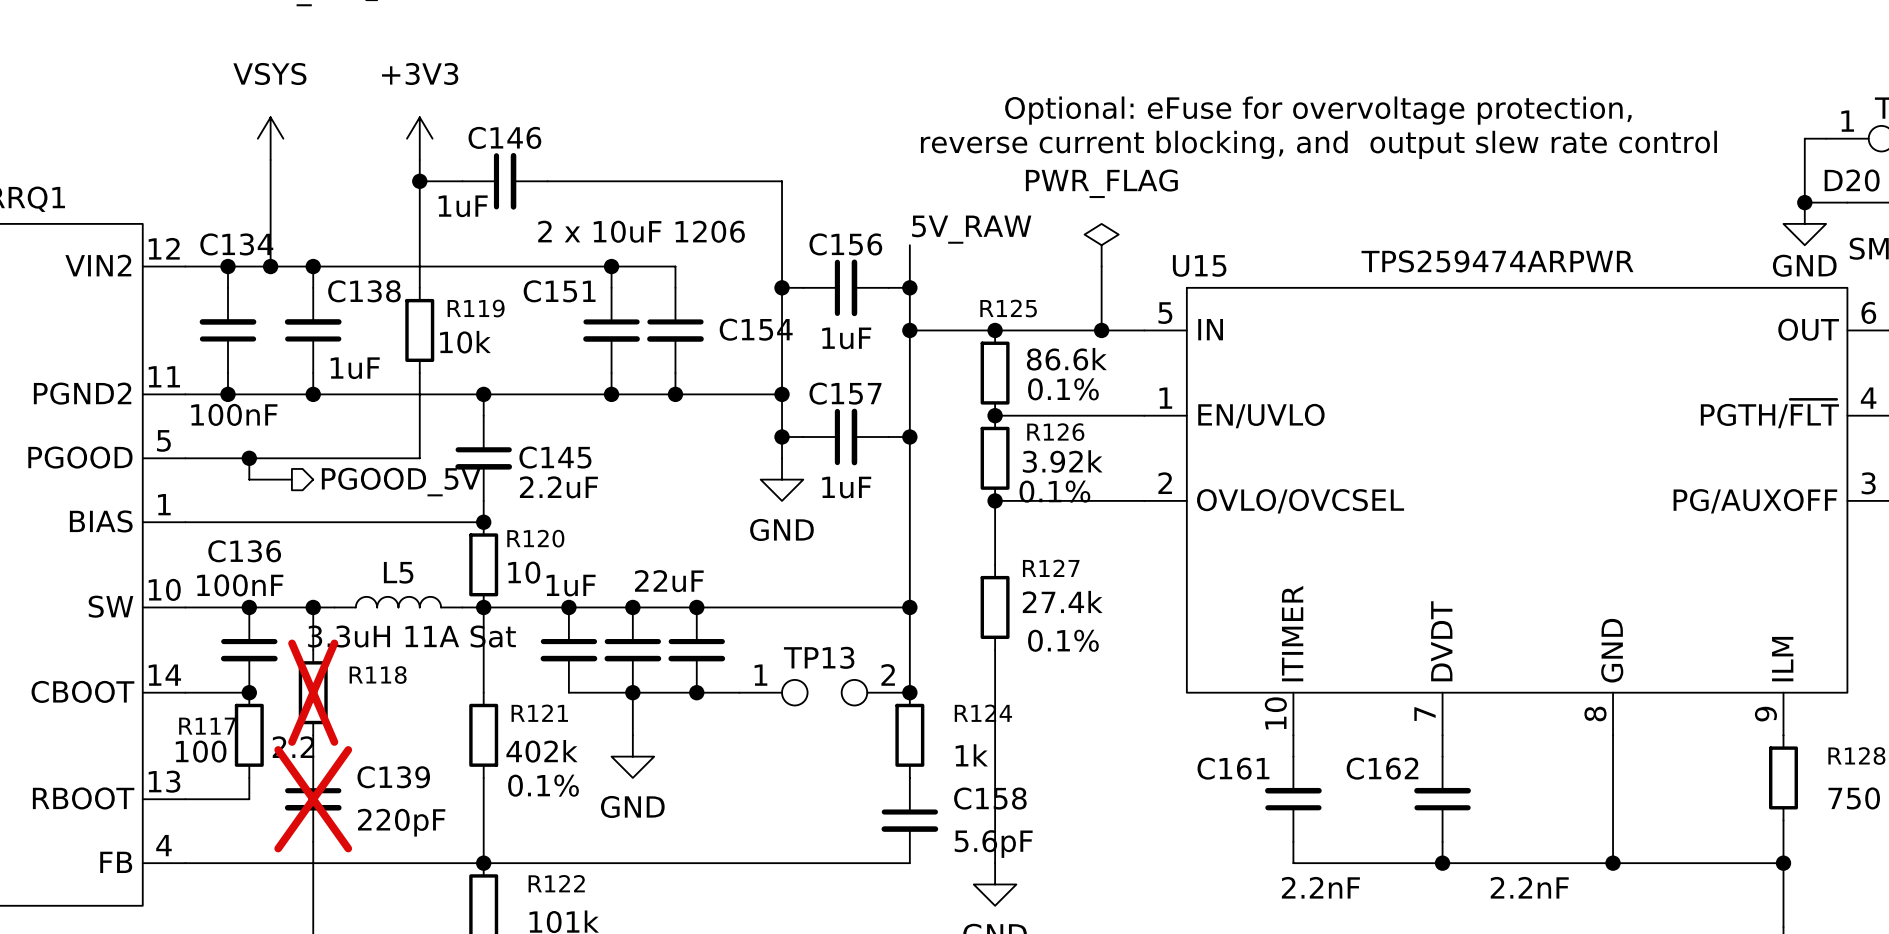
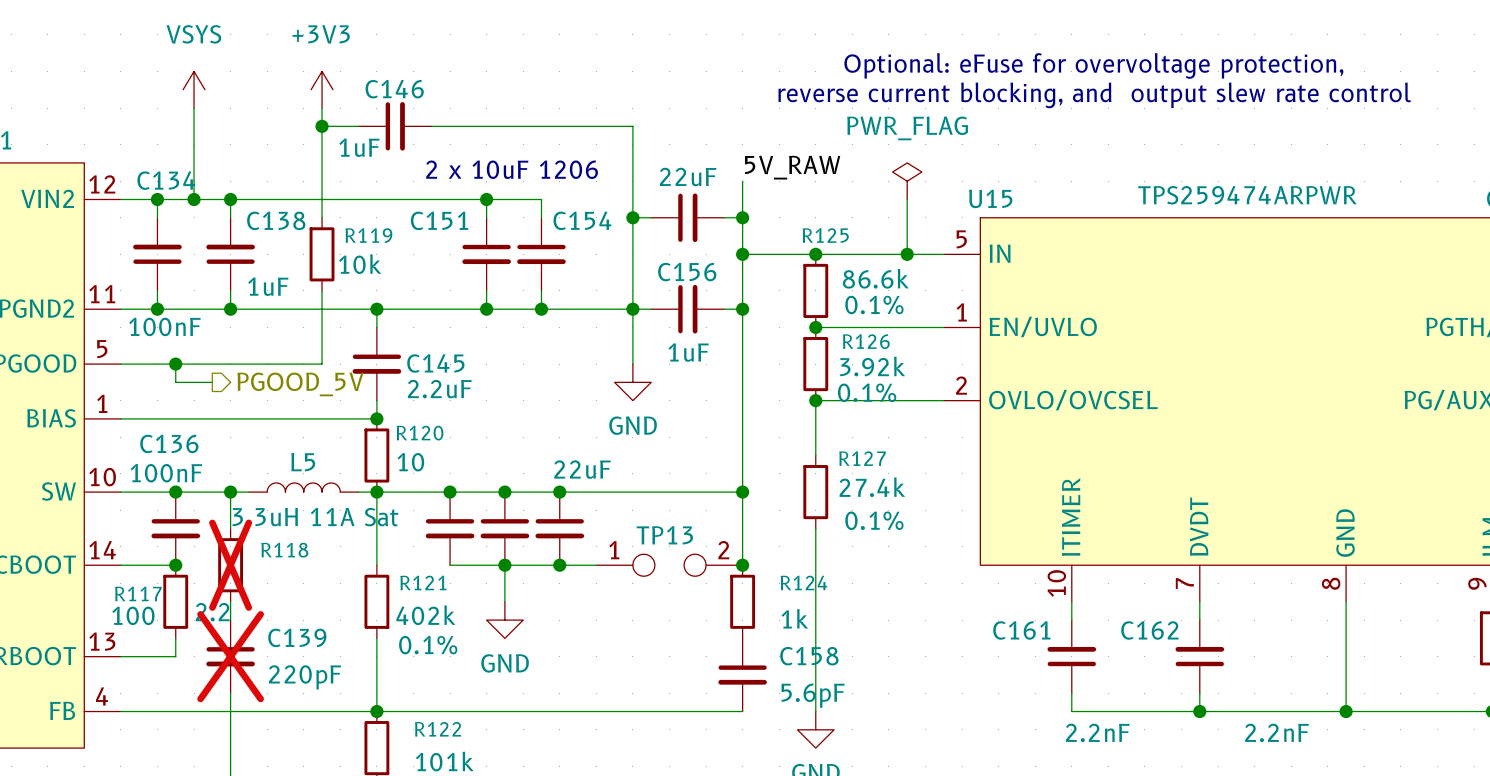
C156 name: C156 (845, 244) -> none
C154 name position: C154 (756, 329) -> C154 (582, 220)
C156 value: 1uF (846, 338) -> 22uF (688, 176)
C156: none -> 1uF (687, 309)
wire: (782, 437) (803, 437) -> (632, 309) (651, 309)
junction: (782, 437) -> none
C157: 1uF (845, 437) -> none
wire: (888, 437) (909, 437) -> (724, 309) (742, 309)
junction position: (909, 437) -> (742, 309)
part value position: 22uF (669, 581) -> 22uF (582, 469)
part value: 1uF (571, 585) -> none

